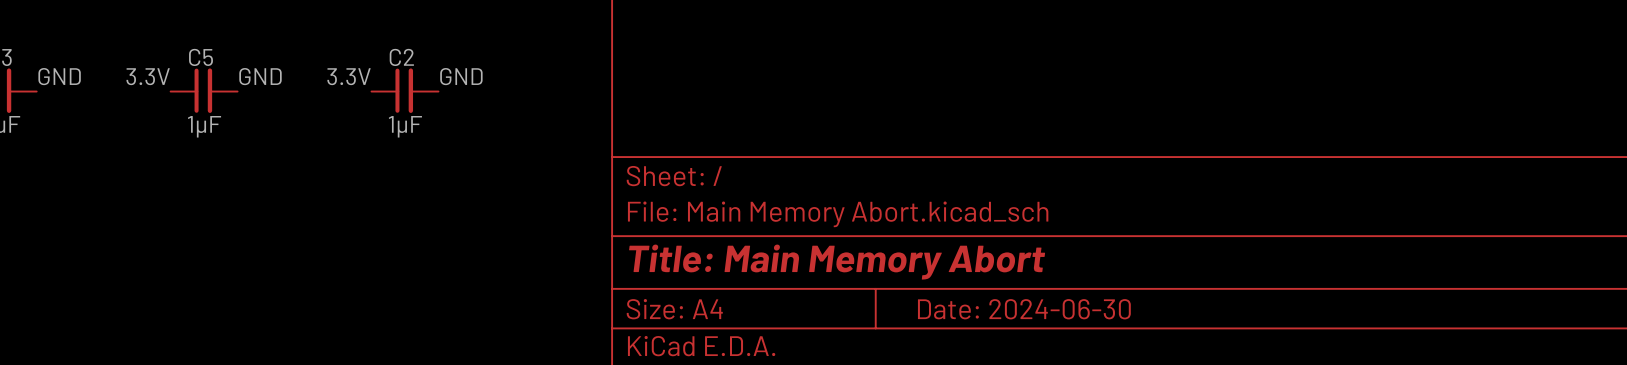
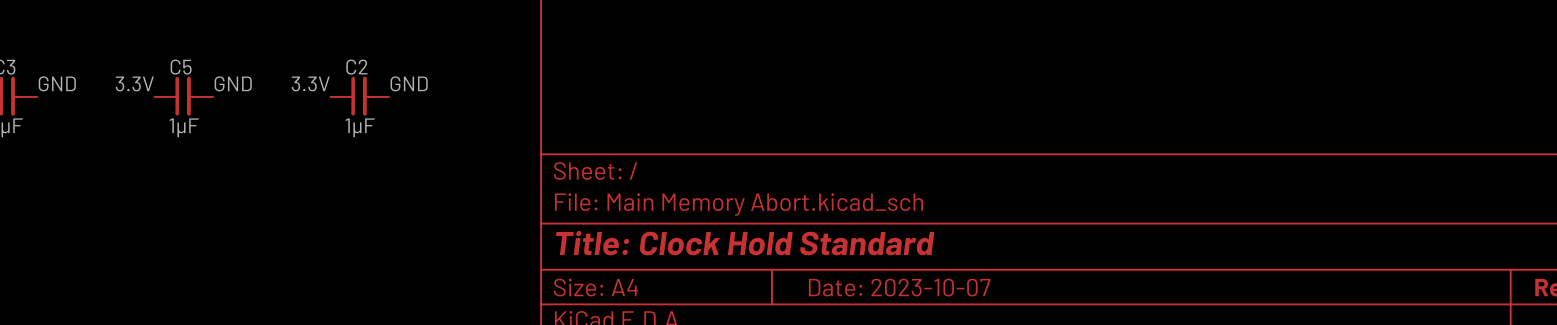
title block: Title: Main Memory Abort (837, 262) -> Title: Clock Hold Standard (745, 243)
title block: Date: 2024-06-30 (1024, 309) -> Date: 2023-10-07 (899, 287)

